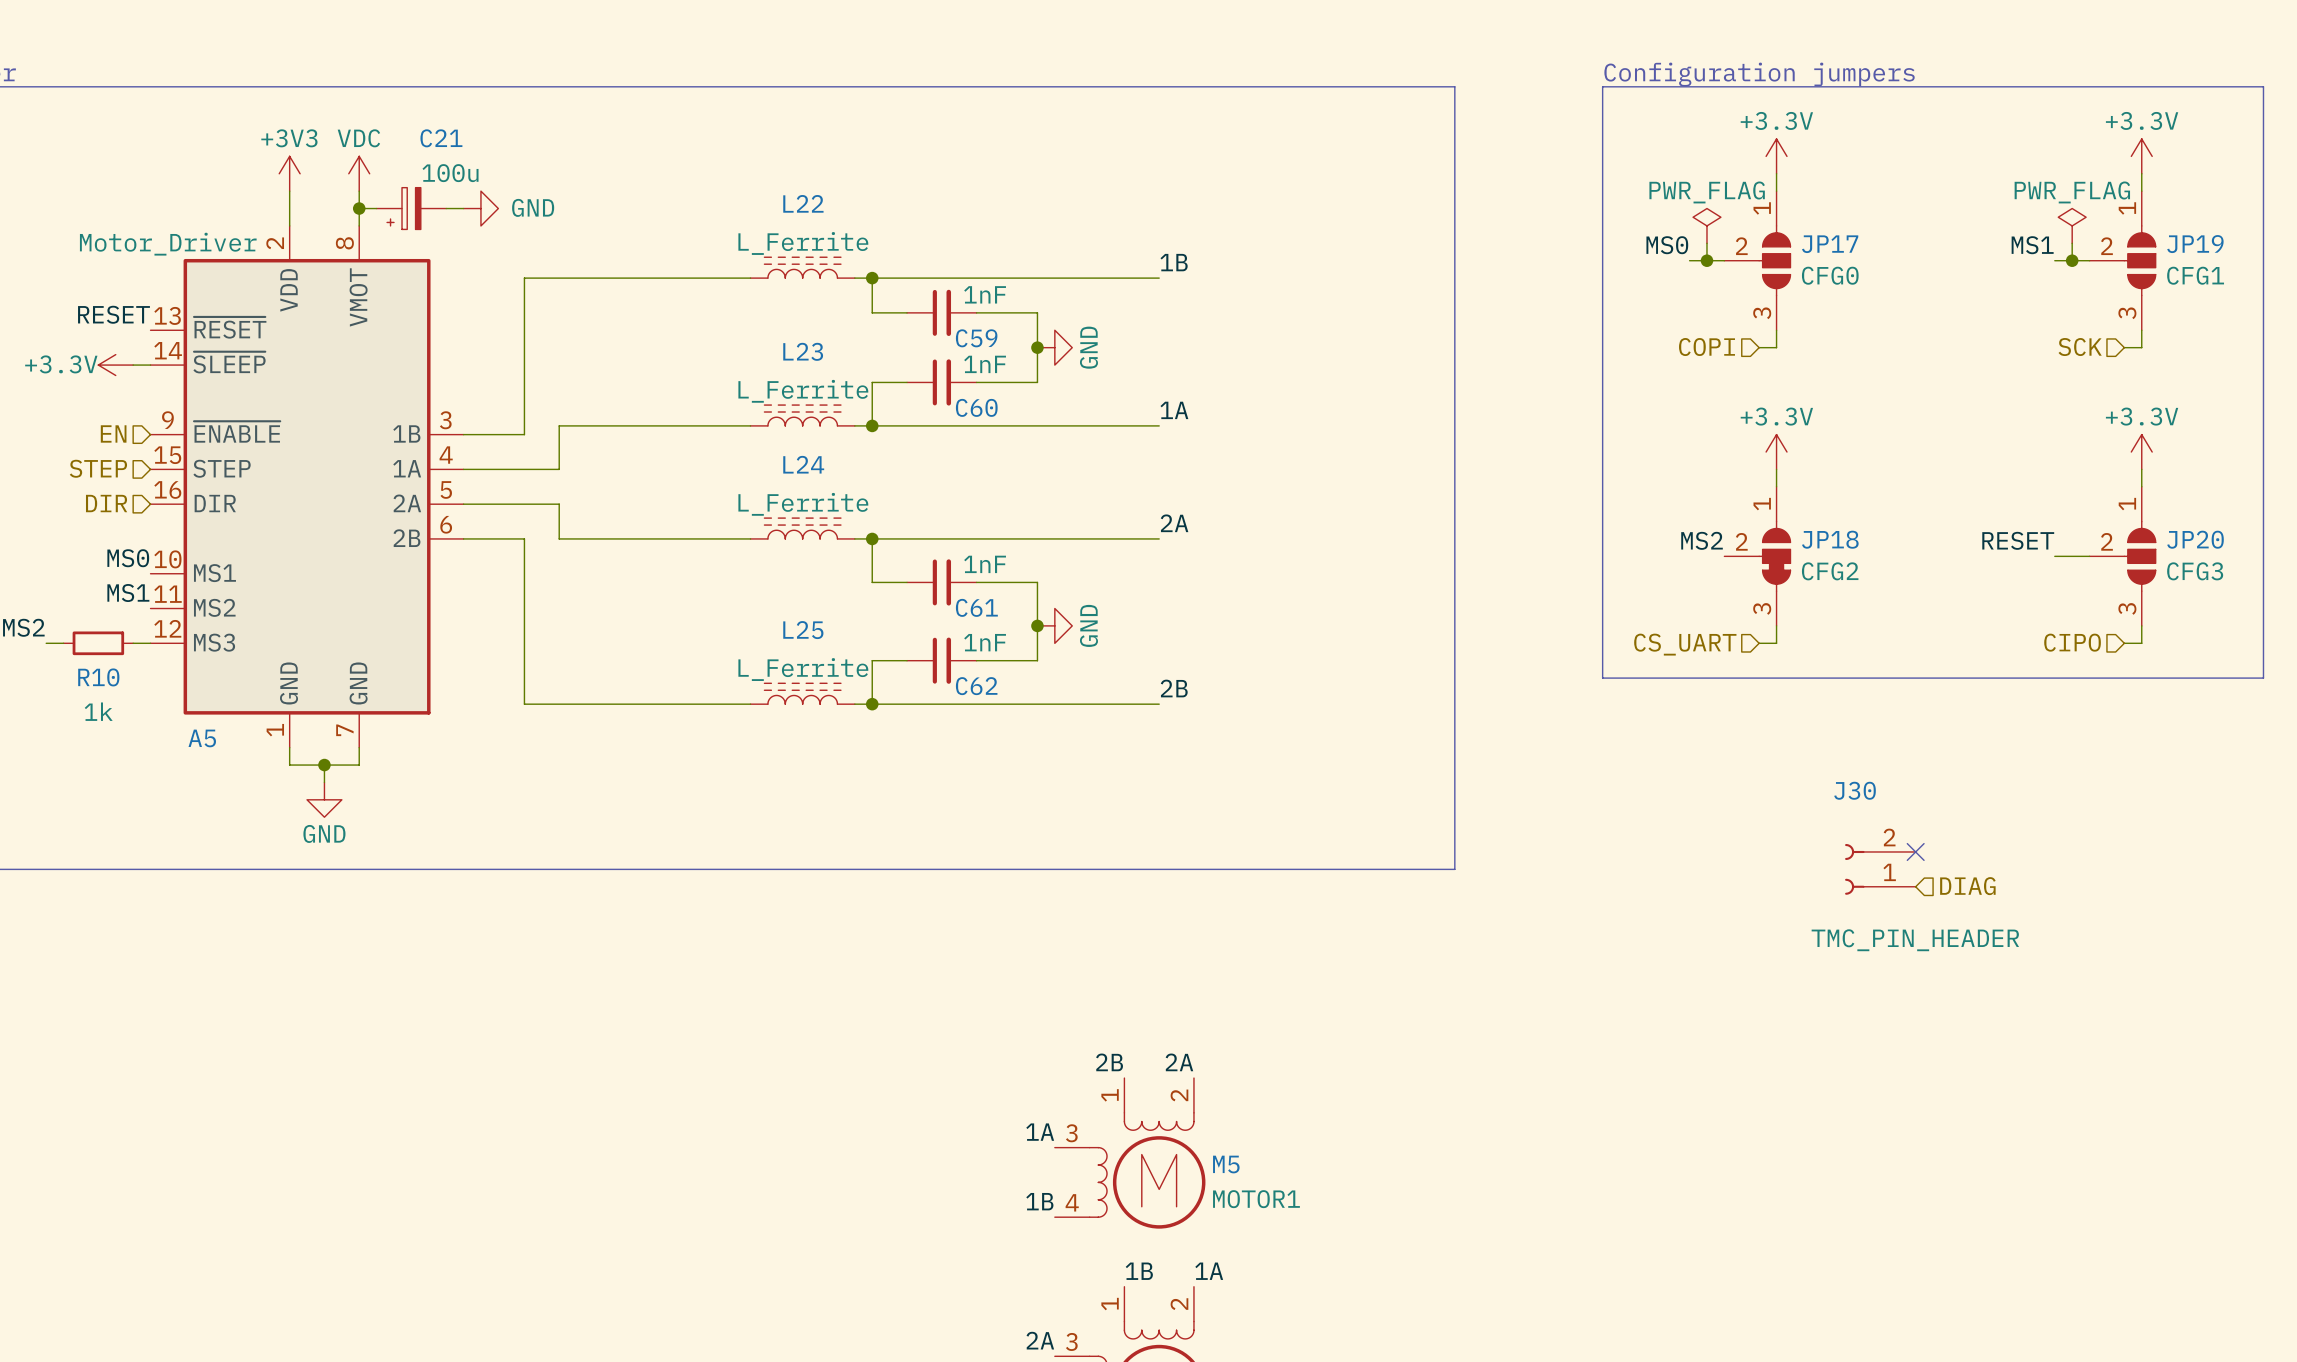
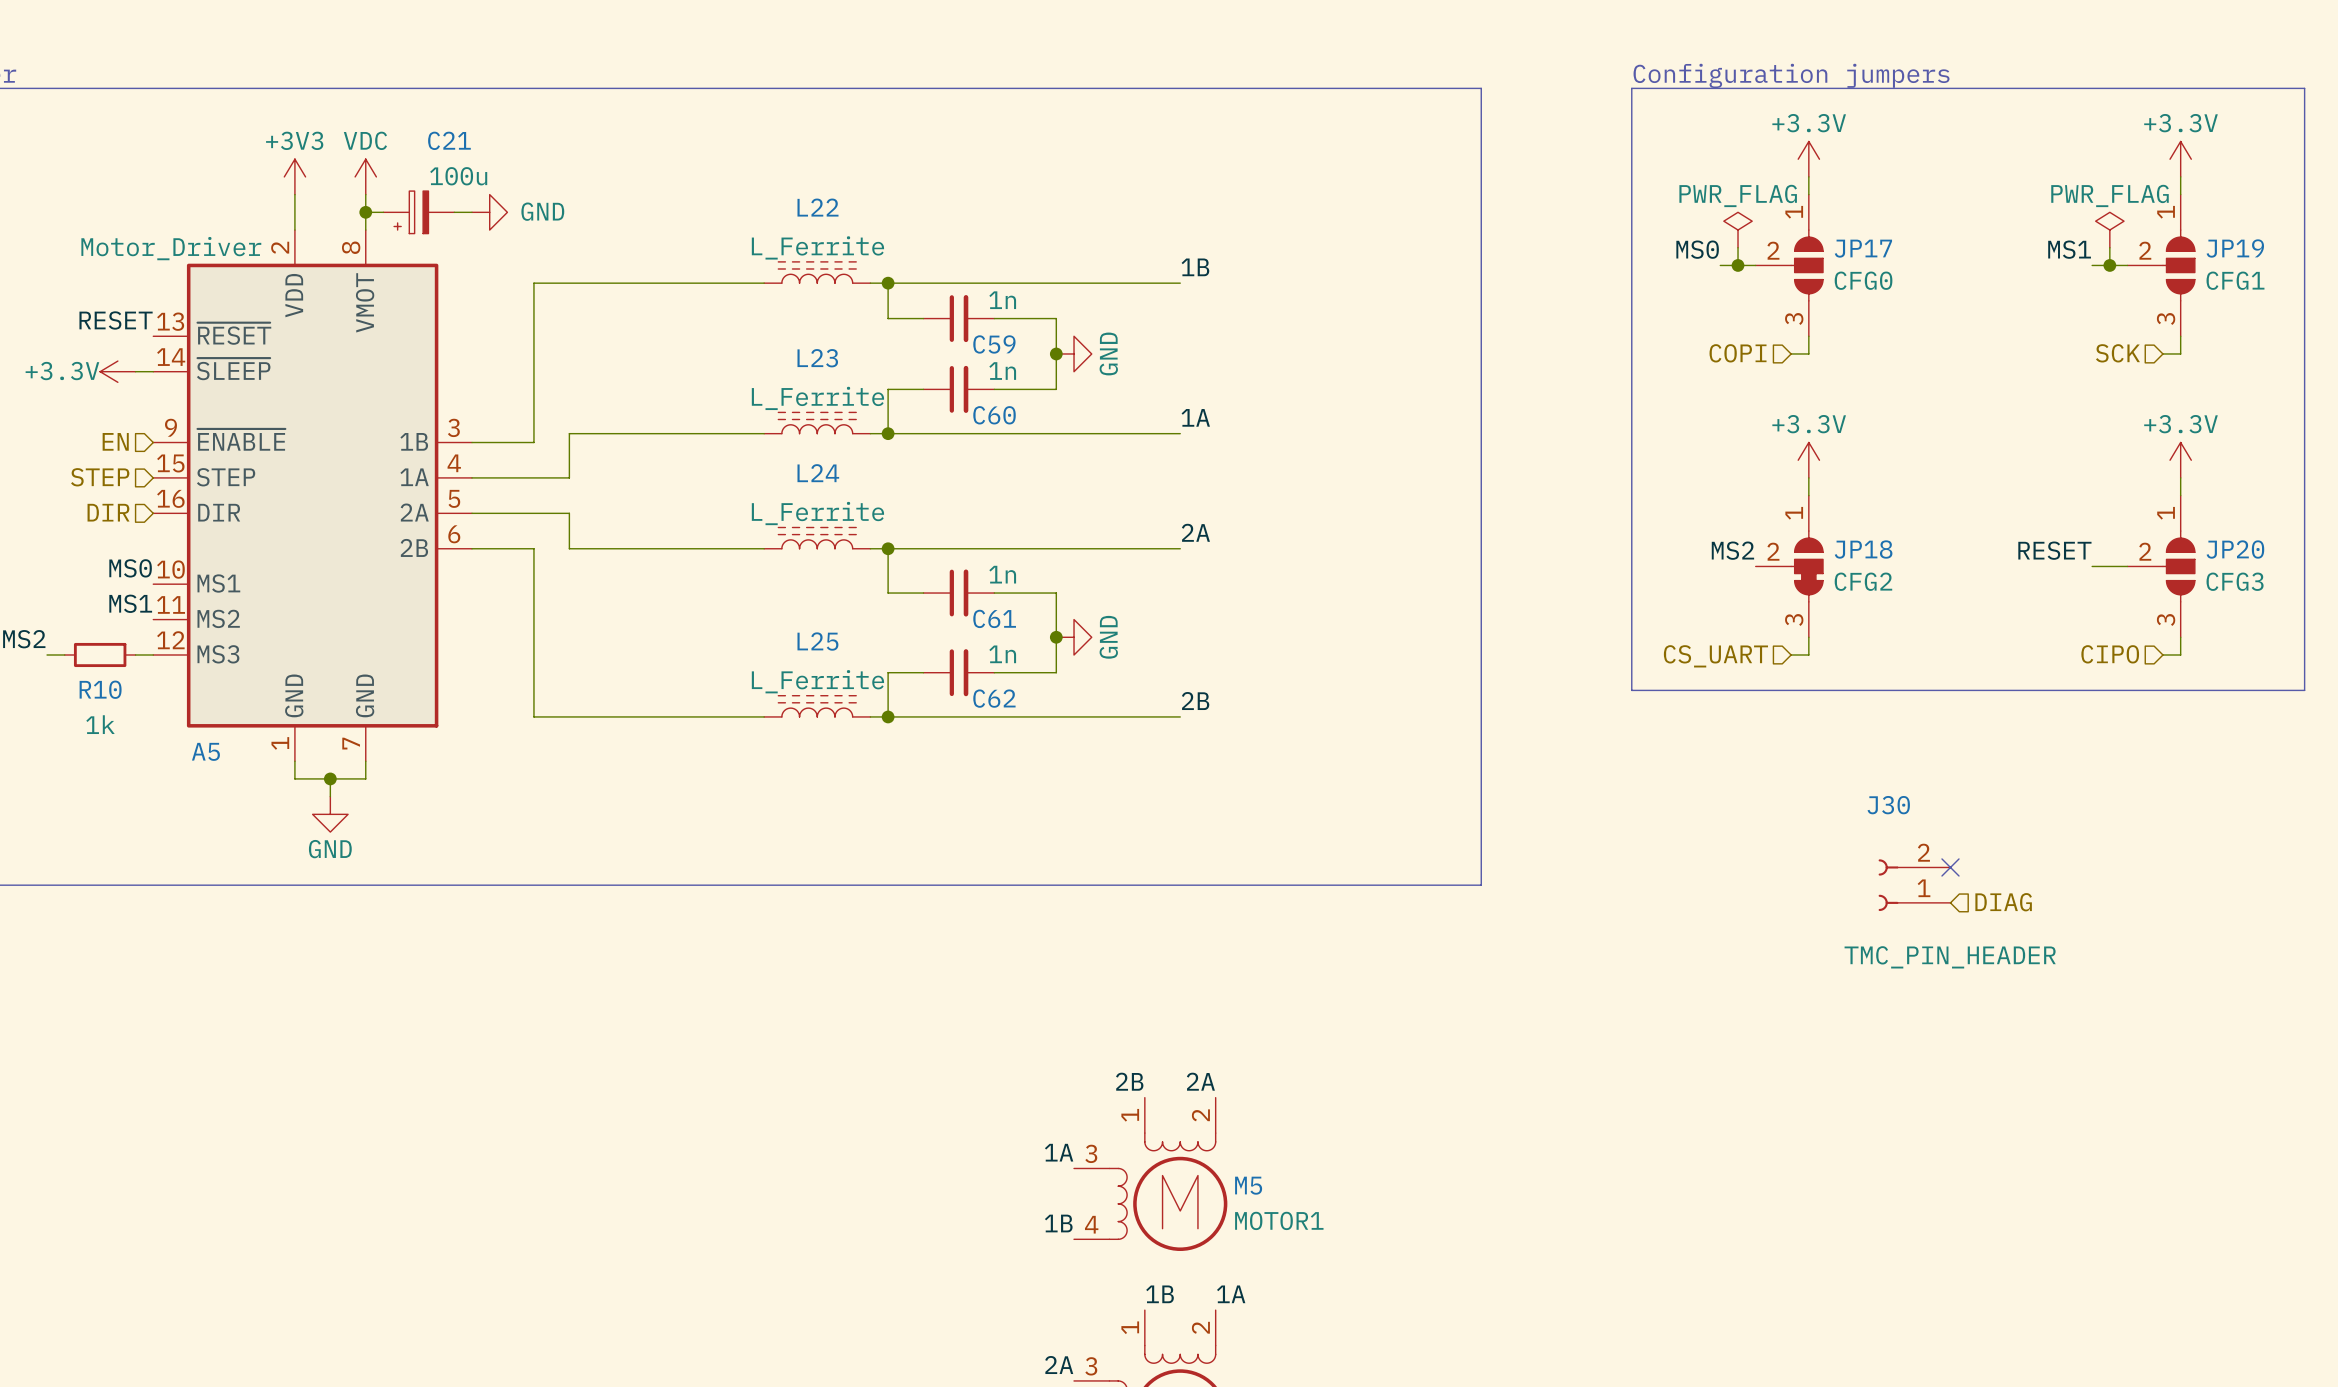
C59 value: 1nF (985, 294) -> 1n (1002, 300)
C60 value: 1nF (985, 364) -> 1n (1002, 371)
C61 value: 1nF (985, 564) -> 1n (1002, 574)
C62 value: 1nF (985, 642) -> 1n (1002, 654)

